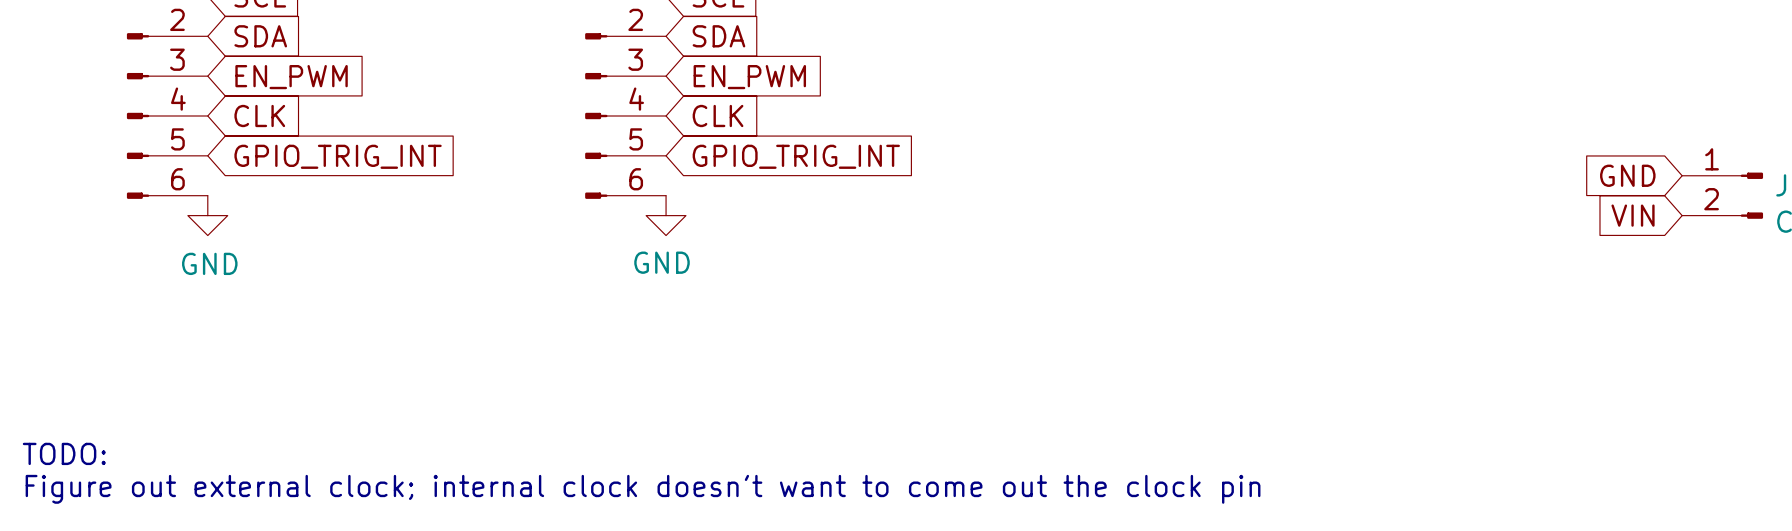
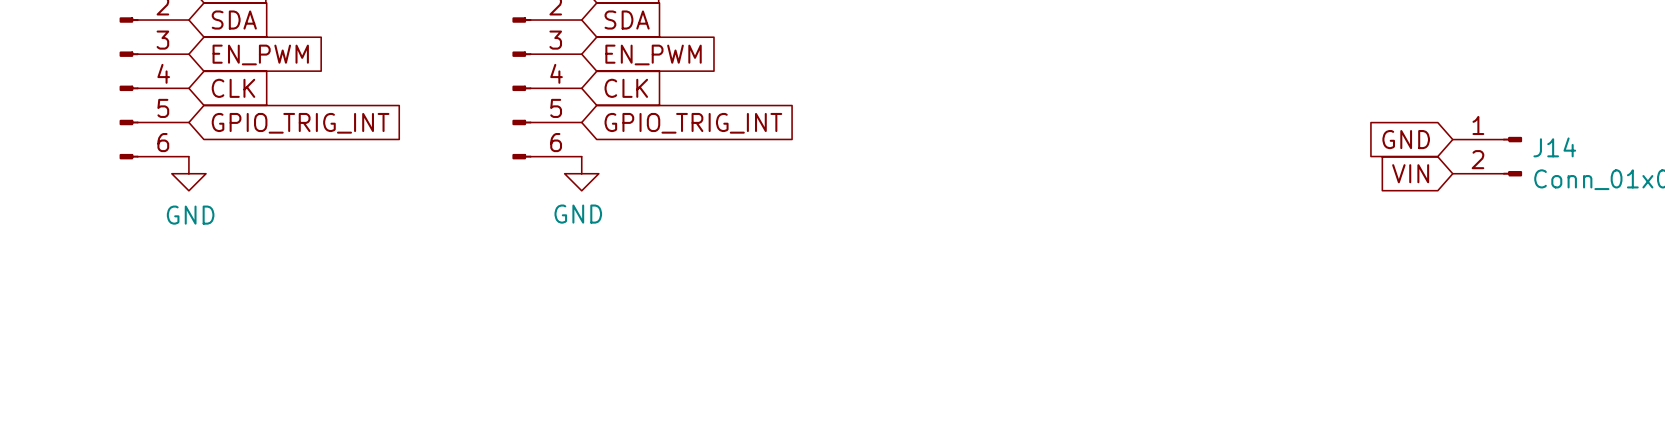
text: TODO: (64, 453) -> none
text: Figure out external clock; internal clock doesn't want to come out the clock pin (643, 489) -> none

